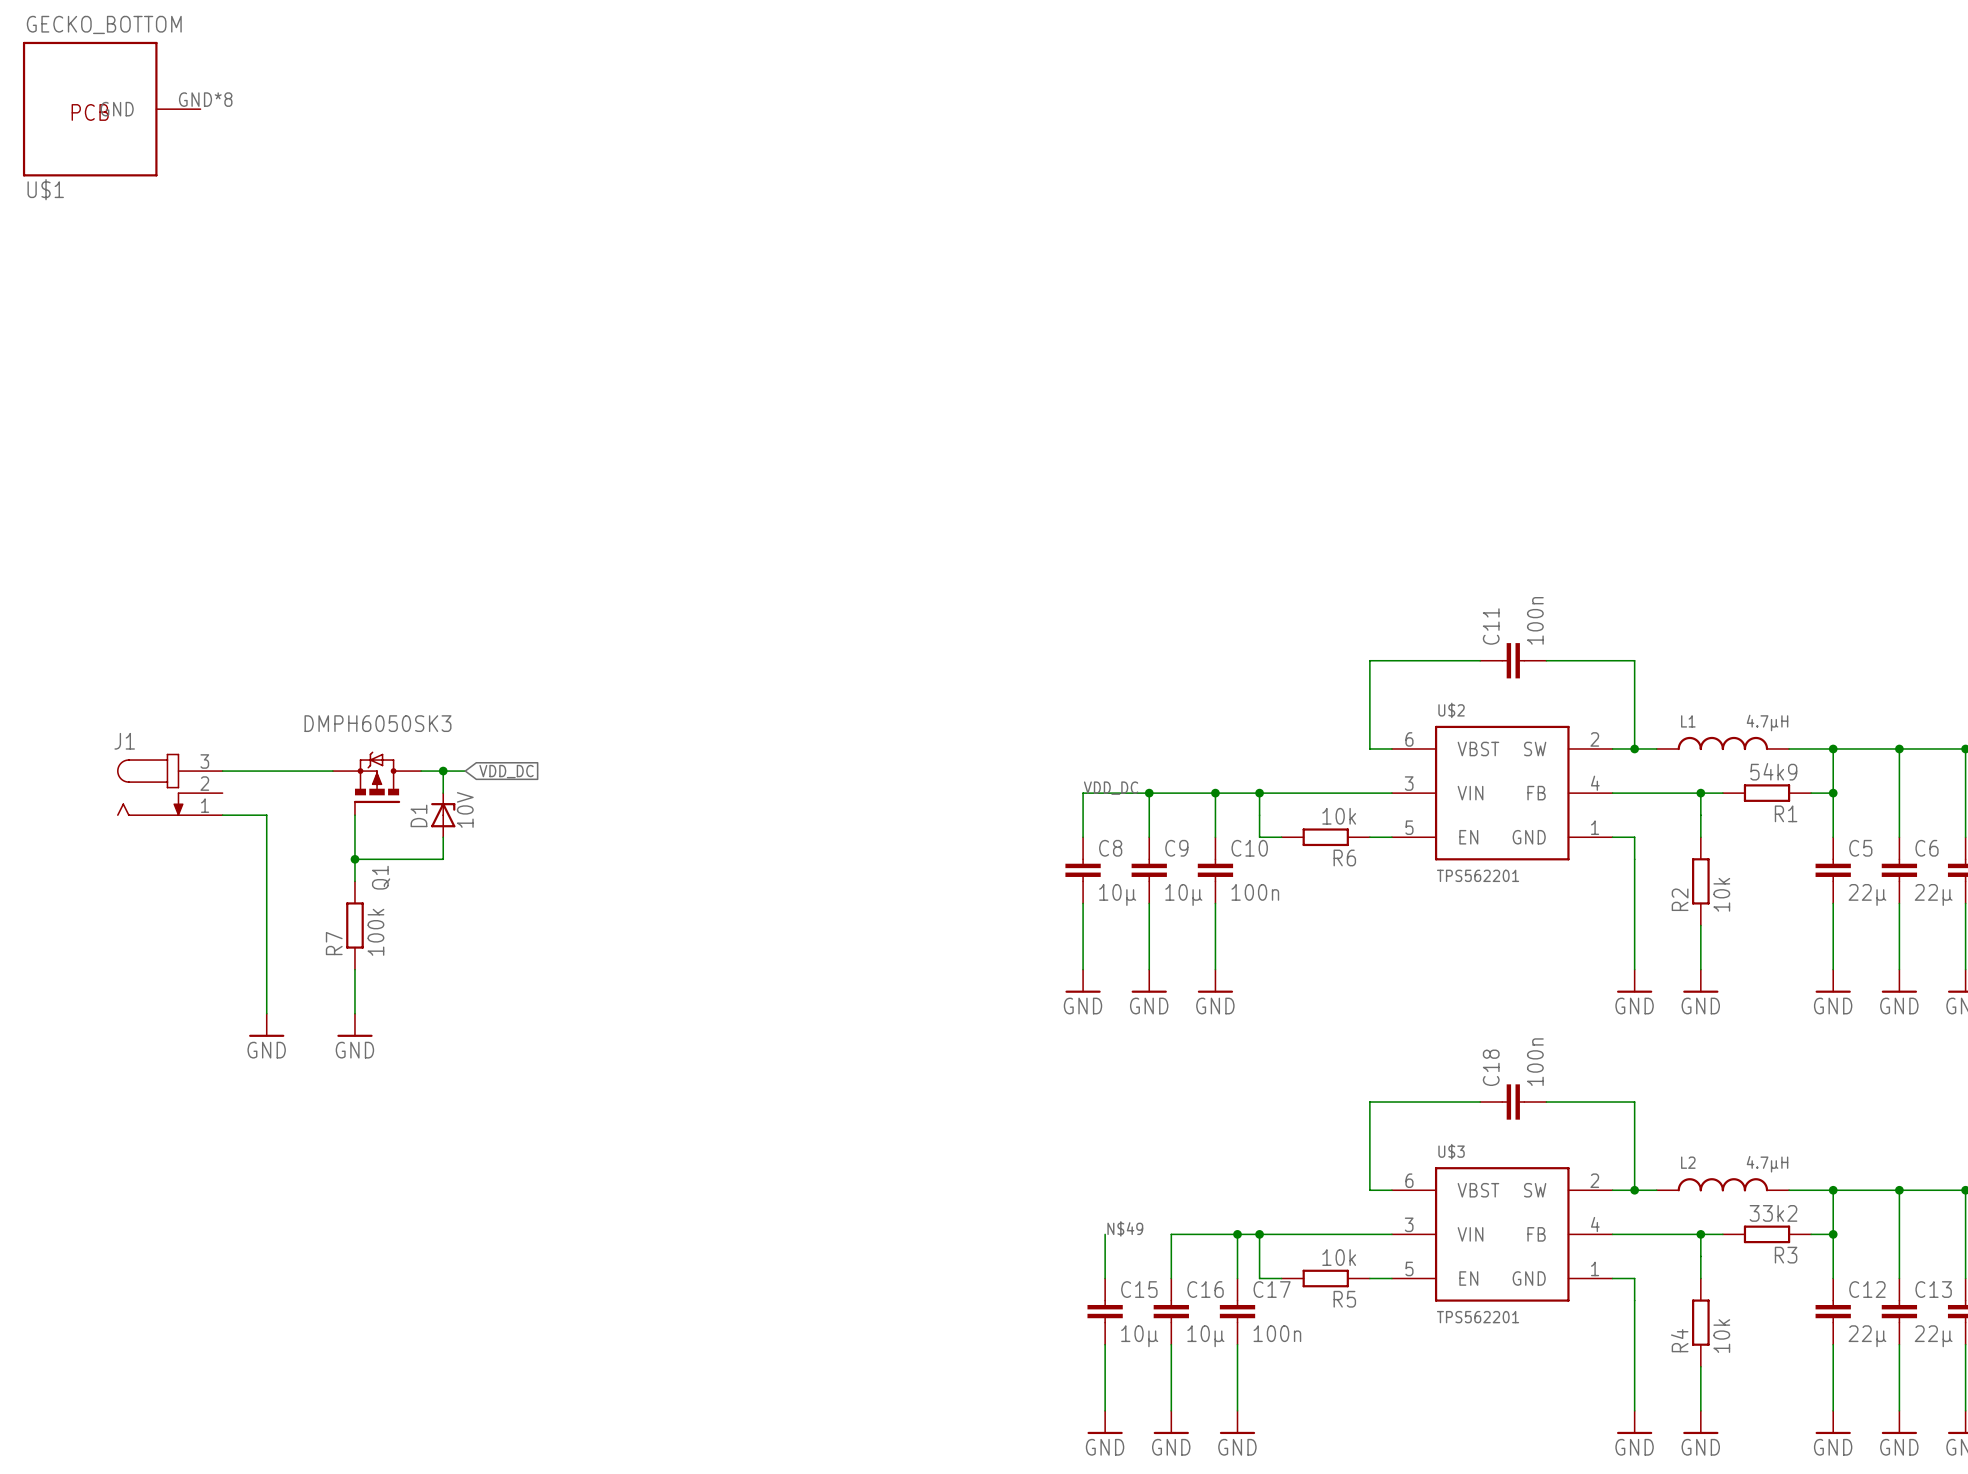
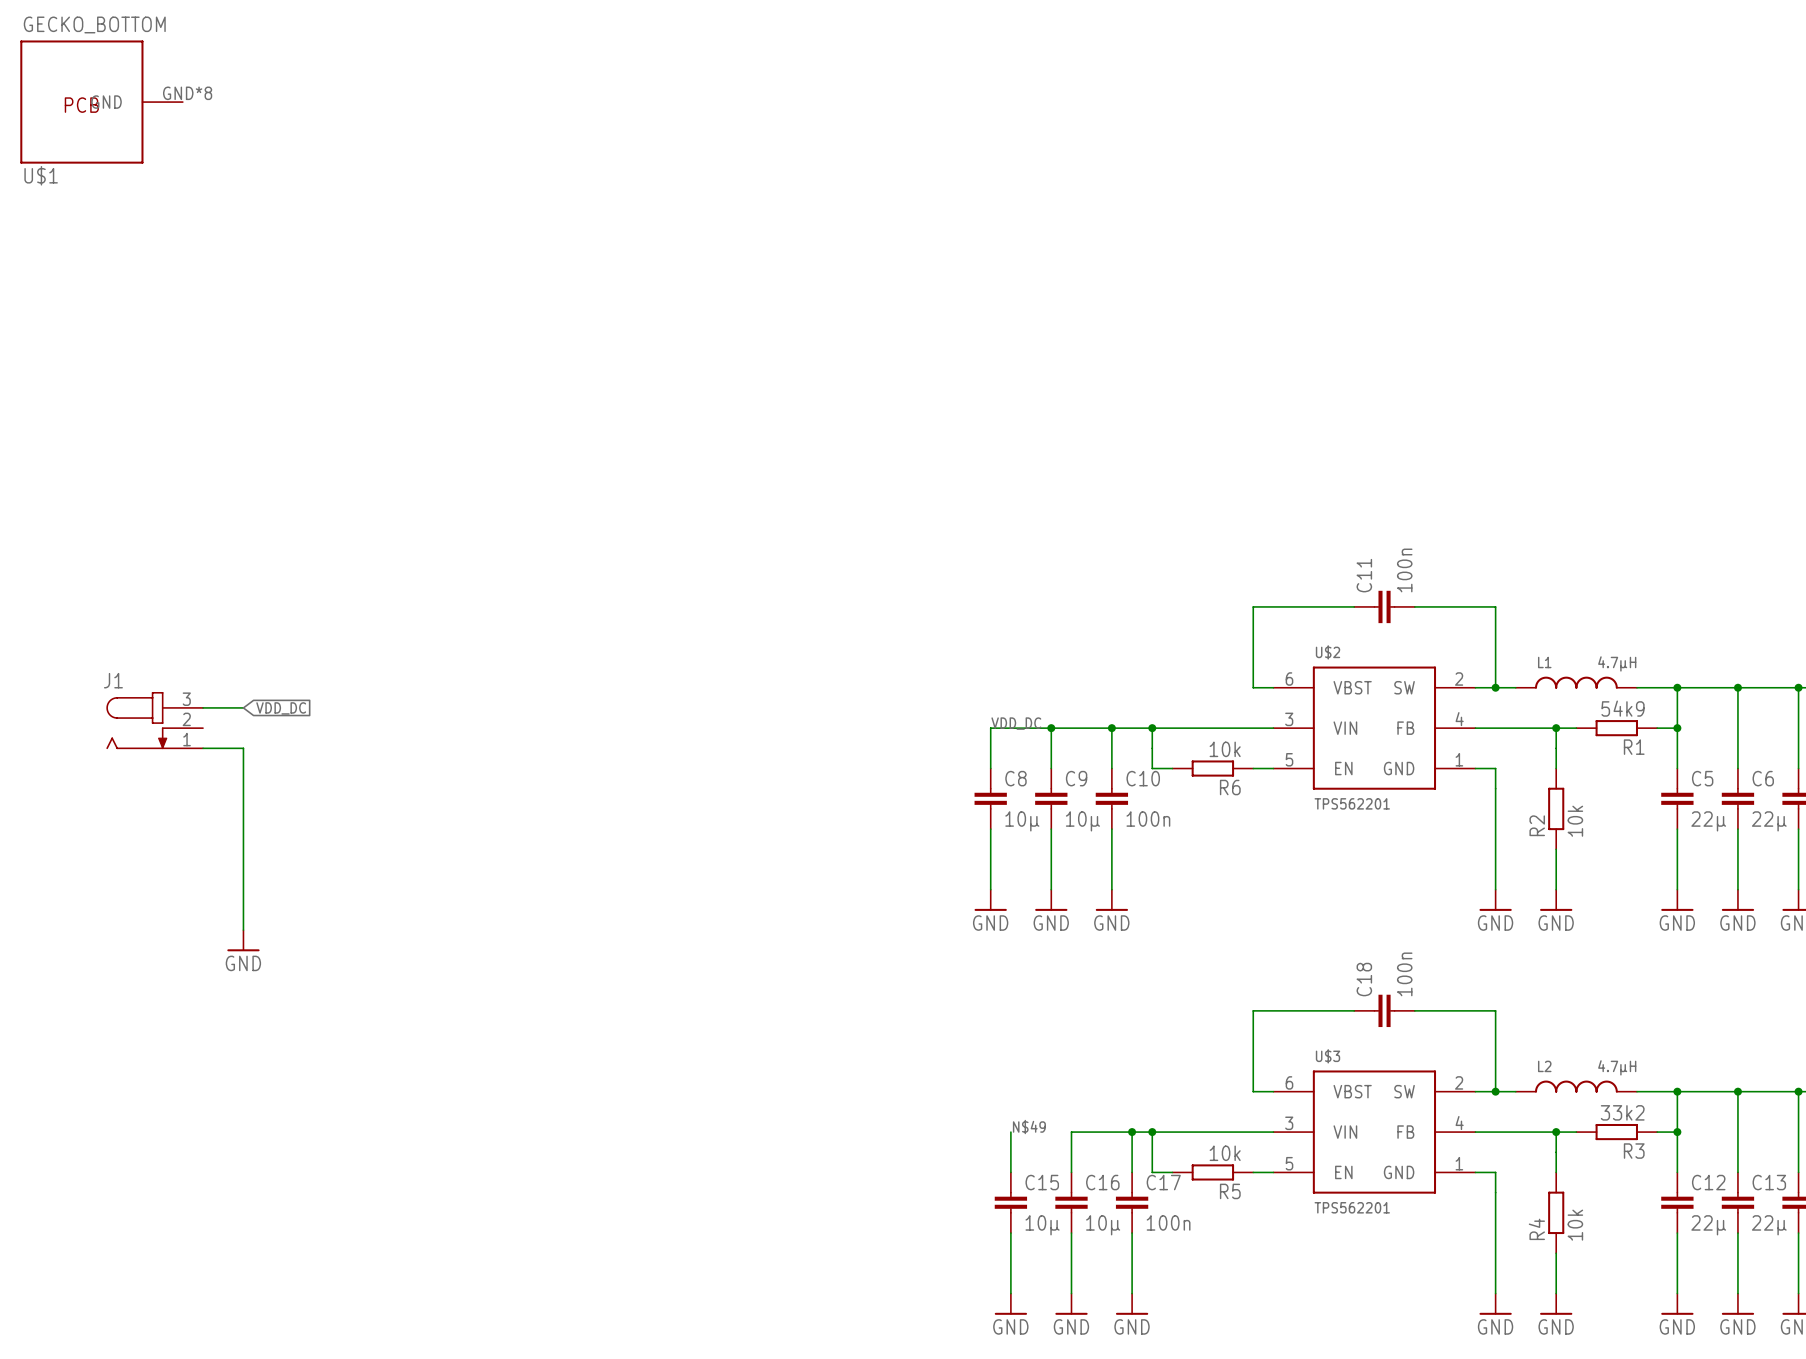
wire: (266, 771) (332, 771) -> none
wire: (421, 771) (465, 771) -> none
wire: (443, 771) (443, 793) -> none
junction: (443, 771) -> none
global label position: VDD_DC (506, 771) -> VDD_DC (281, 708)
Q1: DMPH6050SK3 (377, 783) -> none
wire: (354, 815) (354, 881) -> none
D1: 10V (443, 815) -> none
wire: (443, 837) (443, 859) (354, 859) -> none
junction: (354, 859) -> none
R7: 100k (354, 925) -> none
wire: (354, 969) (354, 1013) -> none
power symbol: GND (354, 1025) -> none

